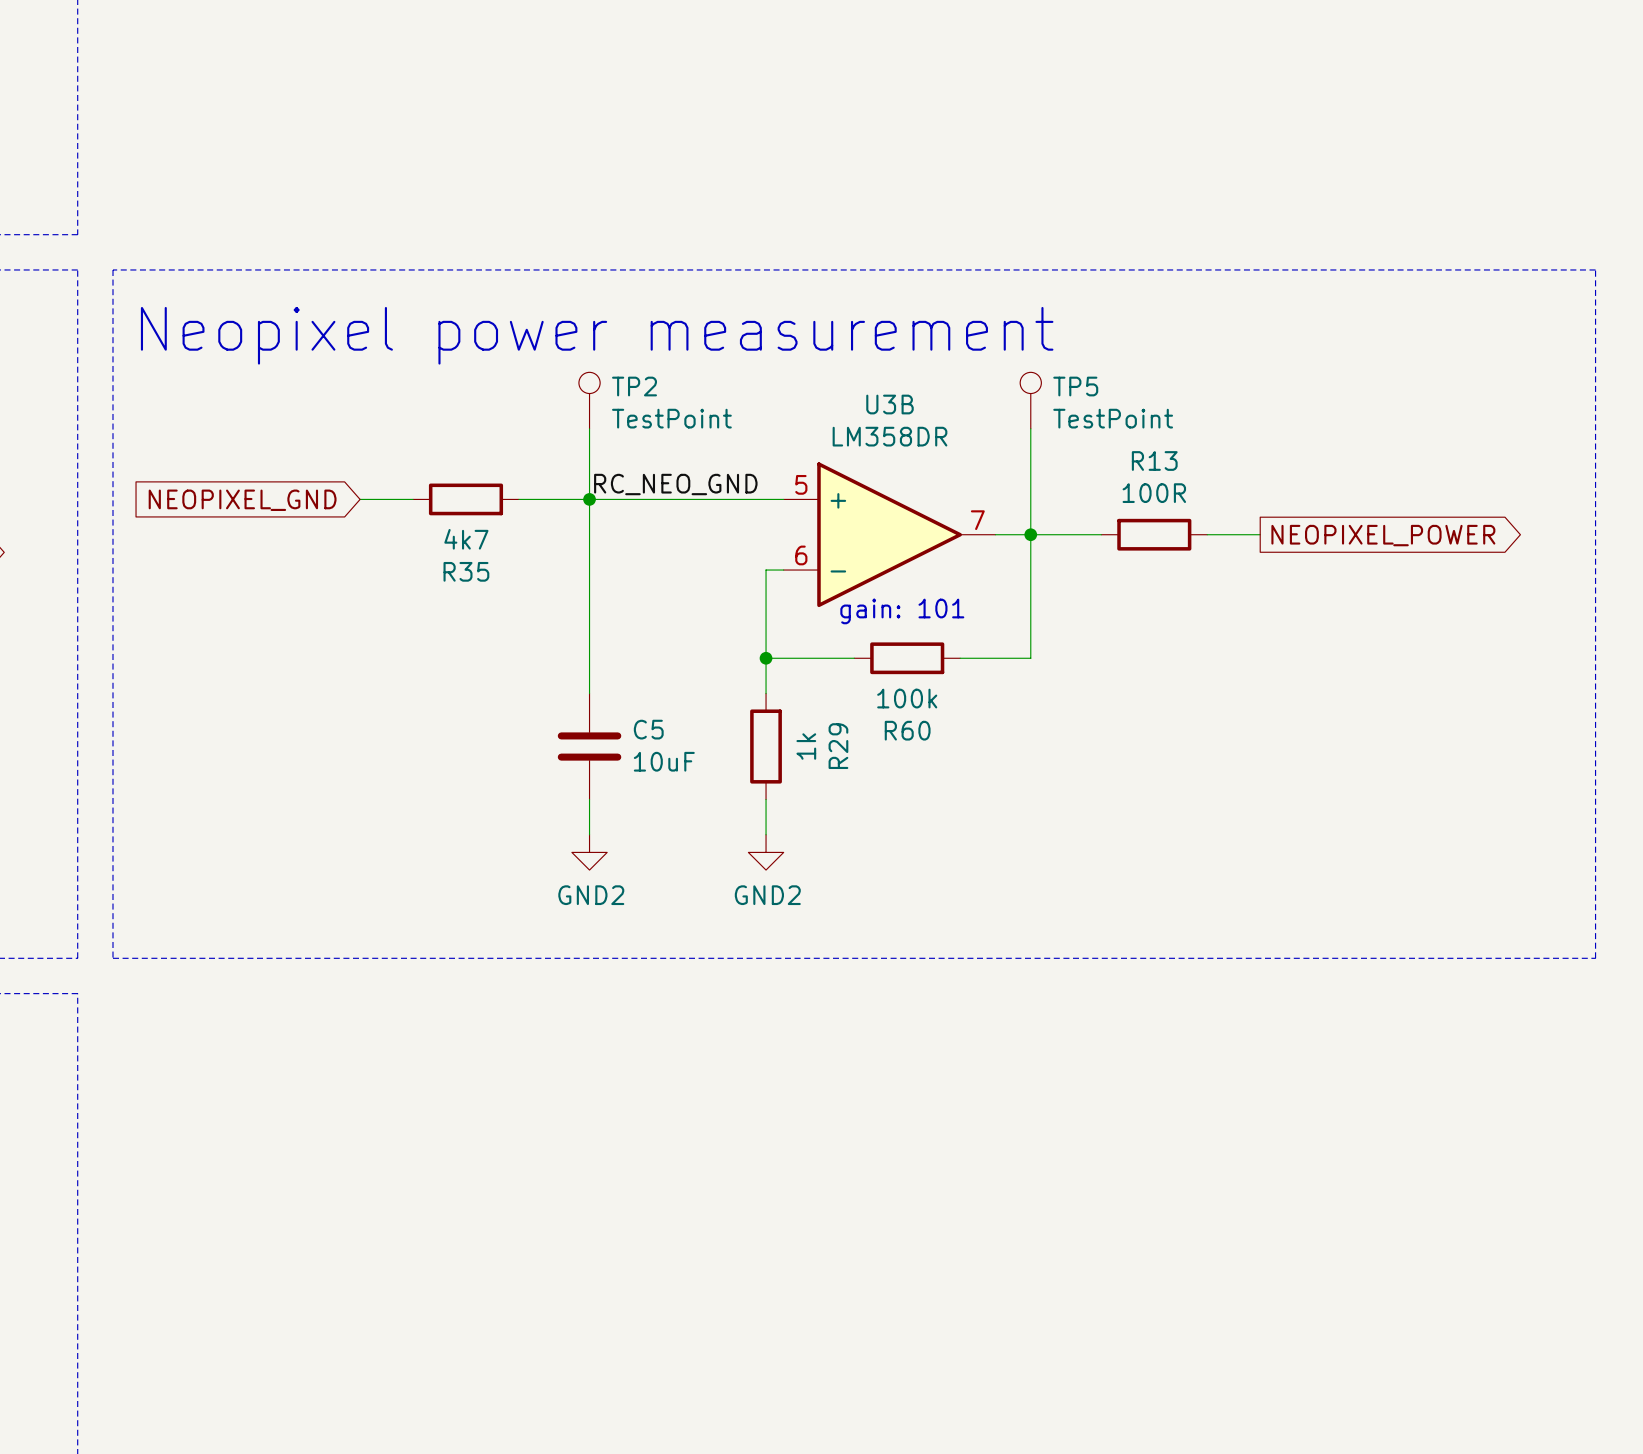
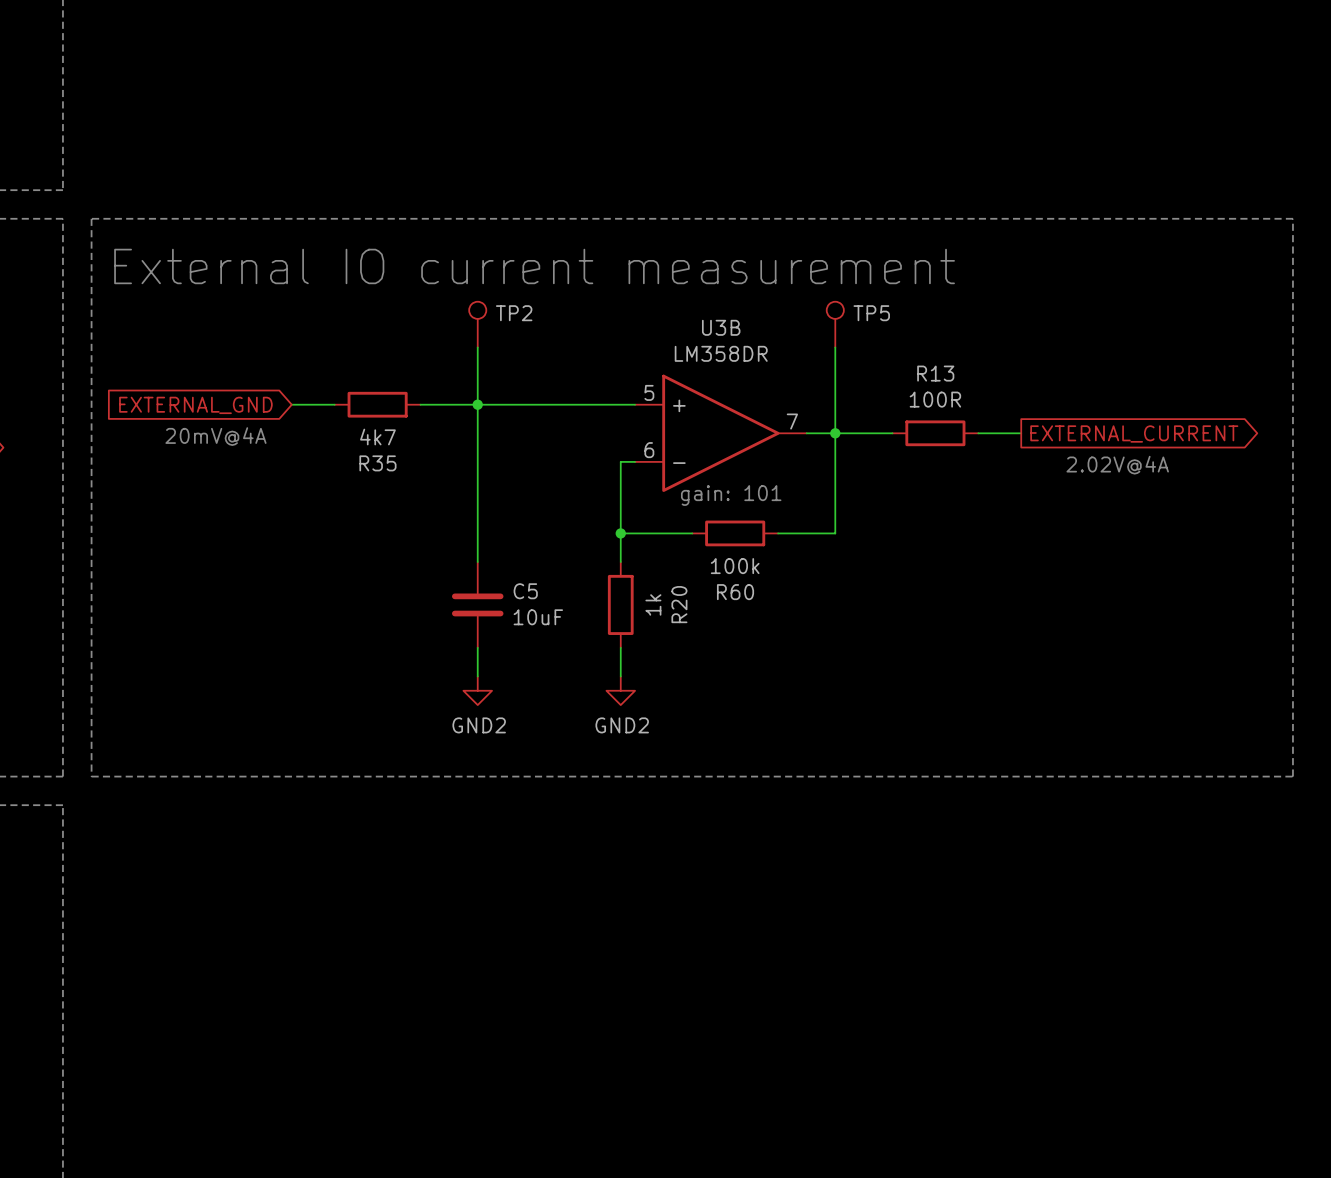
text: Neopixel power measurement (597, 335) -> External IO current measurement (534, 266)
TP2 value: TestPoint (671, 418) -> none
TP5 value: TestPoint (1113, 418) -> none
label: RC_NEO_GND (675, 484) -> none
global label: NEOPIXEL_GND (242, 500) -> EXTERNAL_GND (195, 405)
global label: NEOPIXEL_POWER (1383, 535) -> EXTERNAL_CURRENT (1134, 434)
text: none -> 20mV@4A (215, 436)
text: none -> 2.02V@4A (1117, 465)
R29 name: R29 (838, 746) -> R20 (679, 604)

